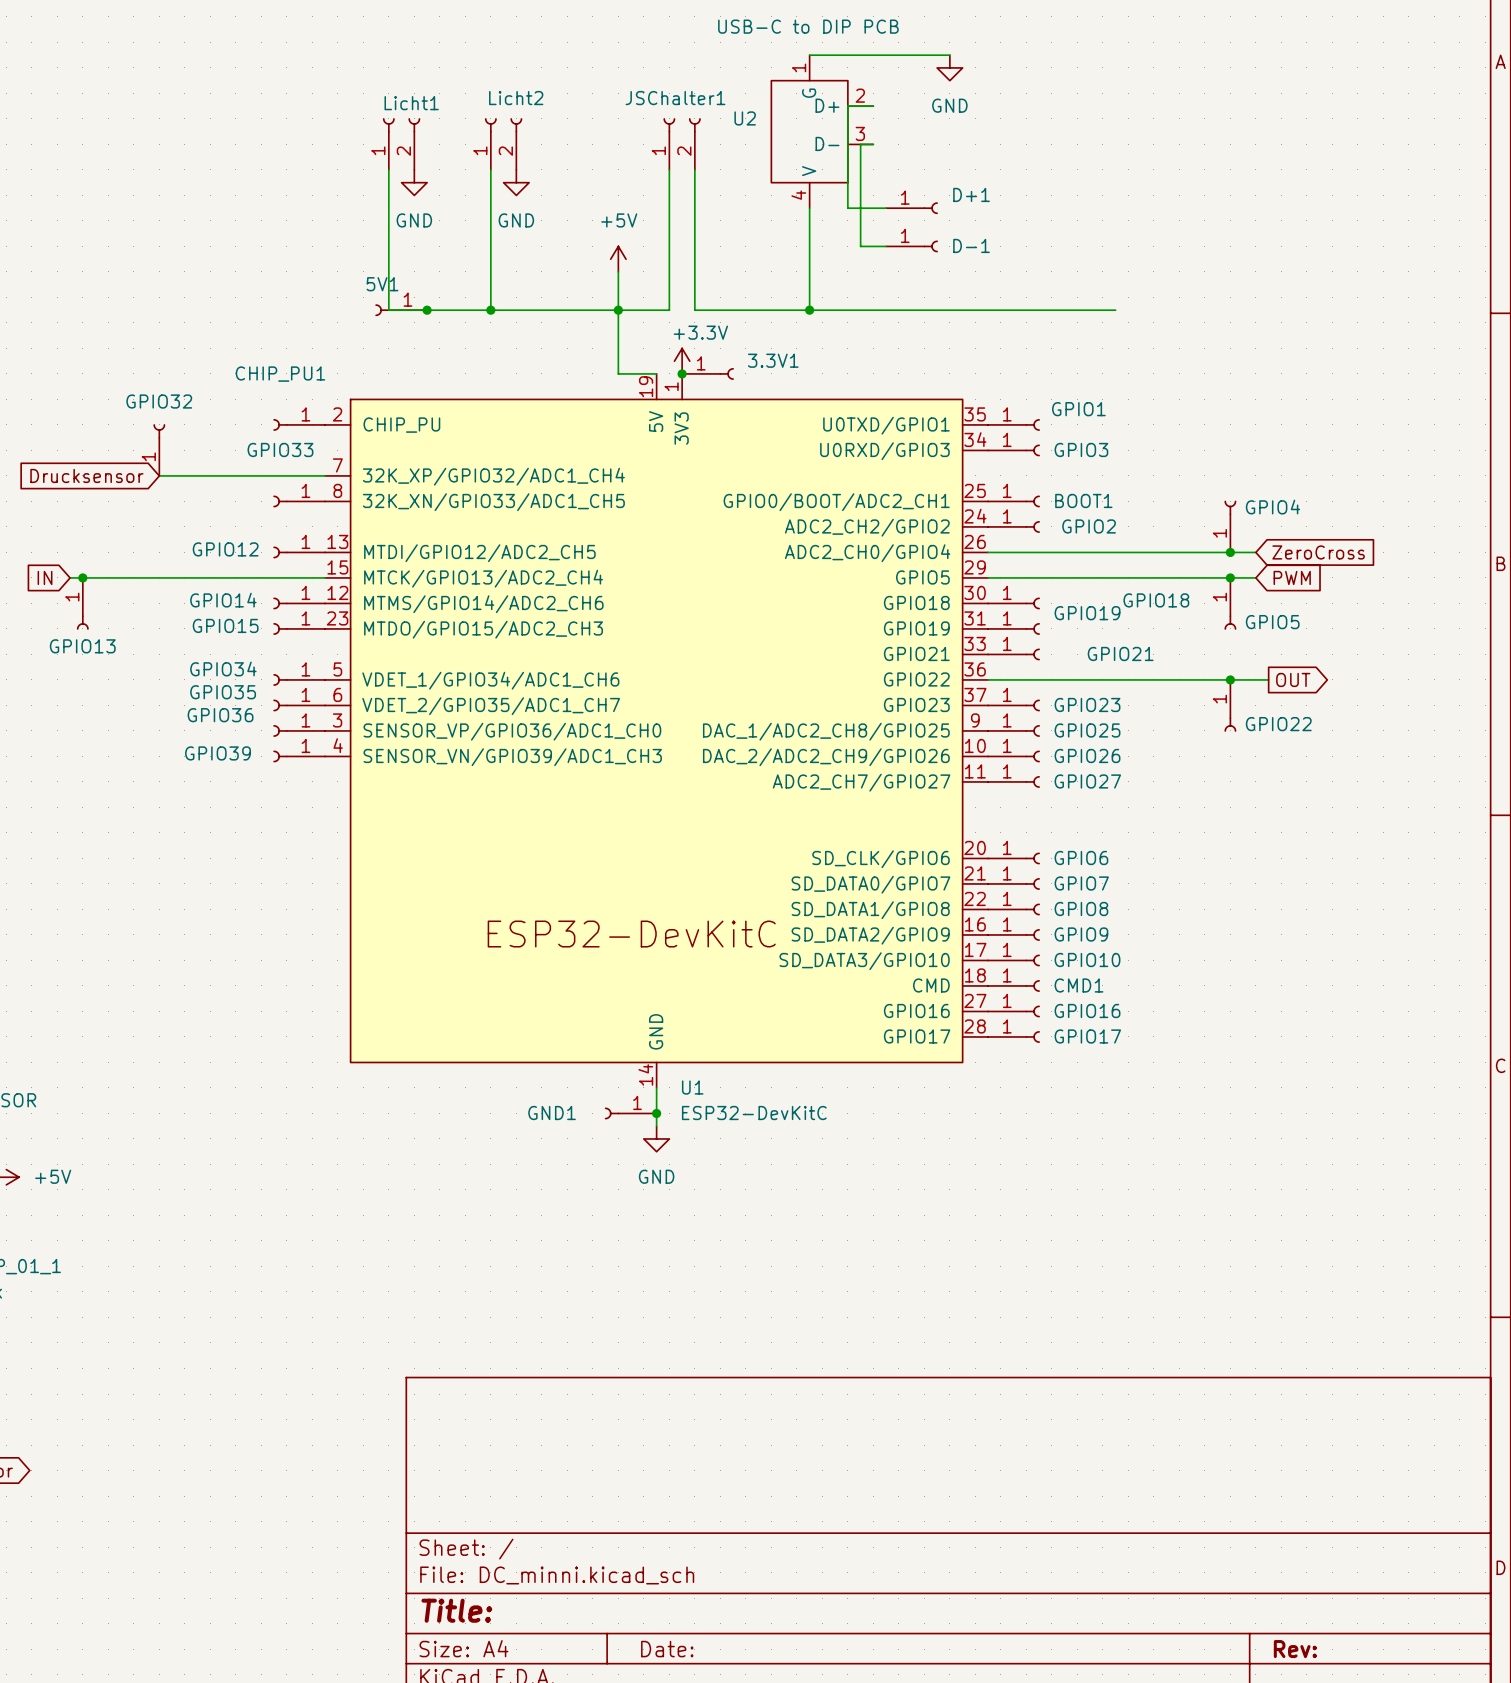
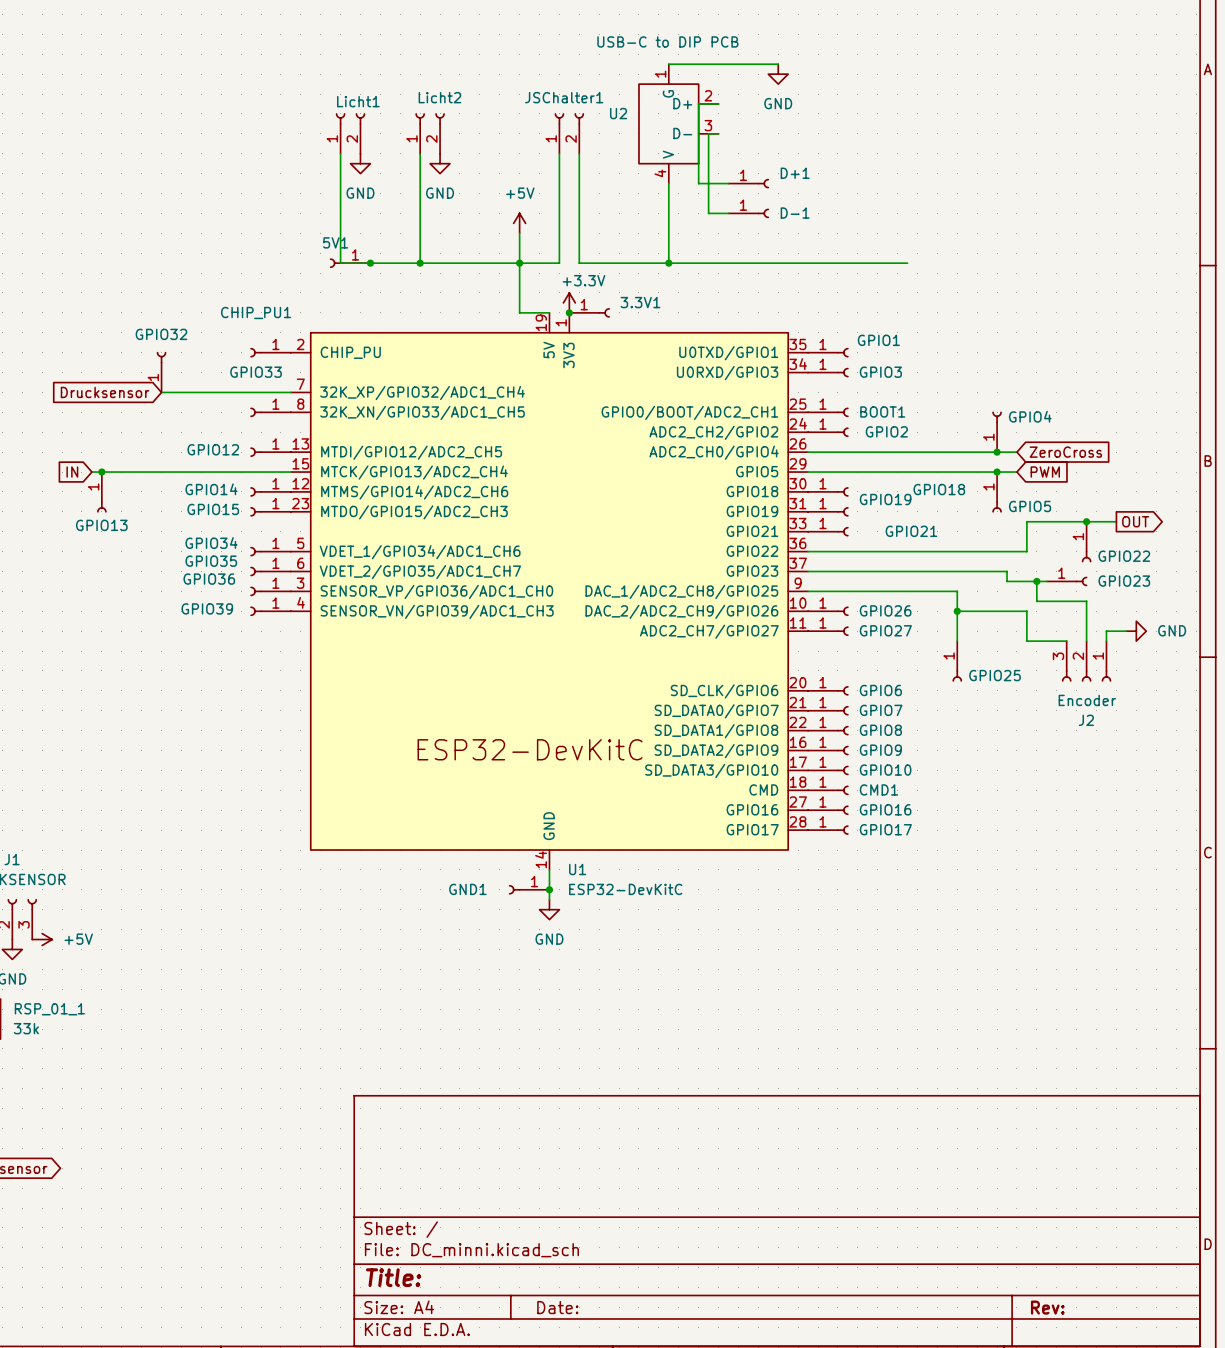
junction: none -> (1086, 521)
wire: none -> (1116, 521) (1026, 521) (1026, 551)
junction: (1230, 679) -> none
global label position: OUT (1293, 679) -> OUT (1135, 521)
wire: none -> (808, 571) (1007, 571) (1007, 581) (1046, 581)
GPIO23 position: (1014, 705) -> (1066, 581)
GPIO22 position: (1230, 705) -> (1086, 541)
wire: none -> (1036, 581) (1036, 601) (1086, 601) (1086, 641)
junction: none -> (1036, 581)
wire: none -> (808, 591) (957, 591) (957, 641)
GPIO25 position: (1014, 730) -> (957, 661)
GPIO25 rotation: 0° (1032, 730) -> 90° clockwise (957, 675)
GPIO25 name position: GPIO25 (1087, 730) -> GPIO25 (995, 675)
wire: none -> (957, 611) (1026, 611) (1026, 641) (1066, 641)
junction: none -> (957, 611)
wire: none -> (1126, 631) (1106, 631) (1106, 641)
power symbol: none -> GND (1136, 631)
J2: none -> Encoder (1086, 661)

